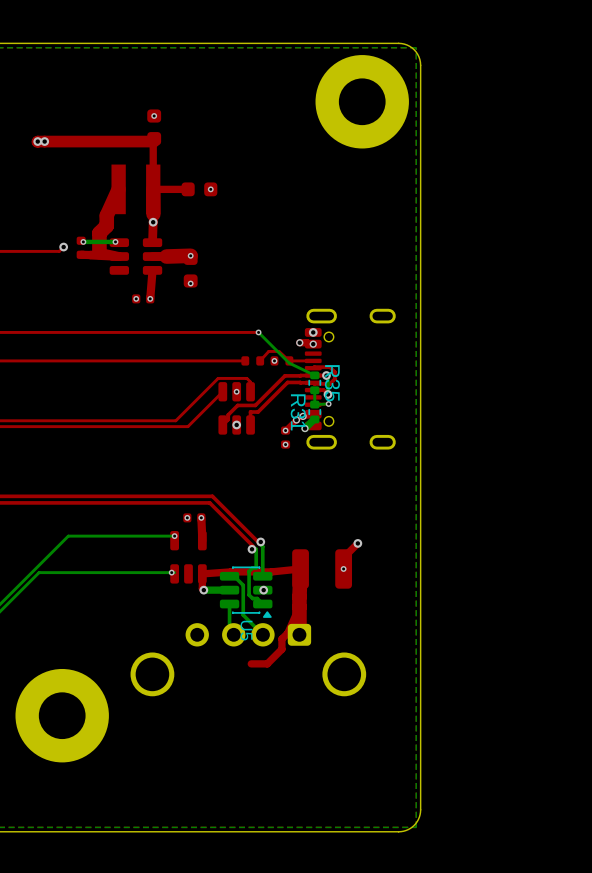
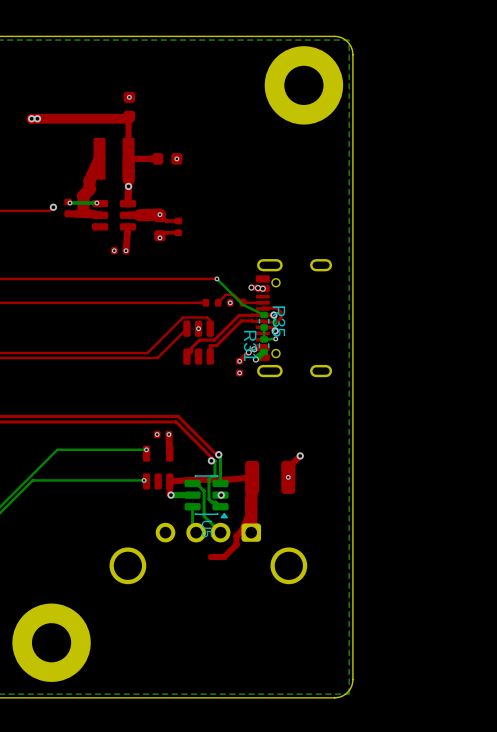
top track: none -> (159, 214) (166, 220) (178, 220)
part: none -> (178, 226)
top track: none -> (178, 232) (165, 232) (159, 237)
via: (313, 332) -> none
via: none -> (257, 288)
via: (236, 424) -> none
part position: (62, 715) -> (51, 642)

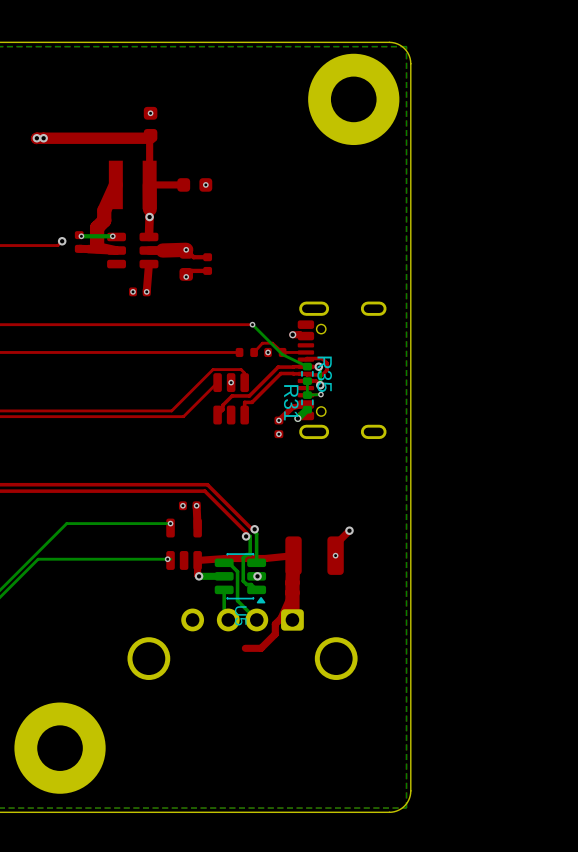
via: (257, 288) -> none
via: (262, 288) -> none
via: (254, 349) -> none
via: (248, 352) -> none

